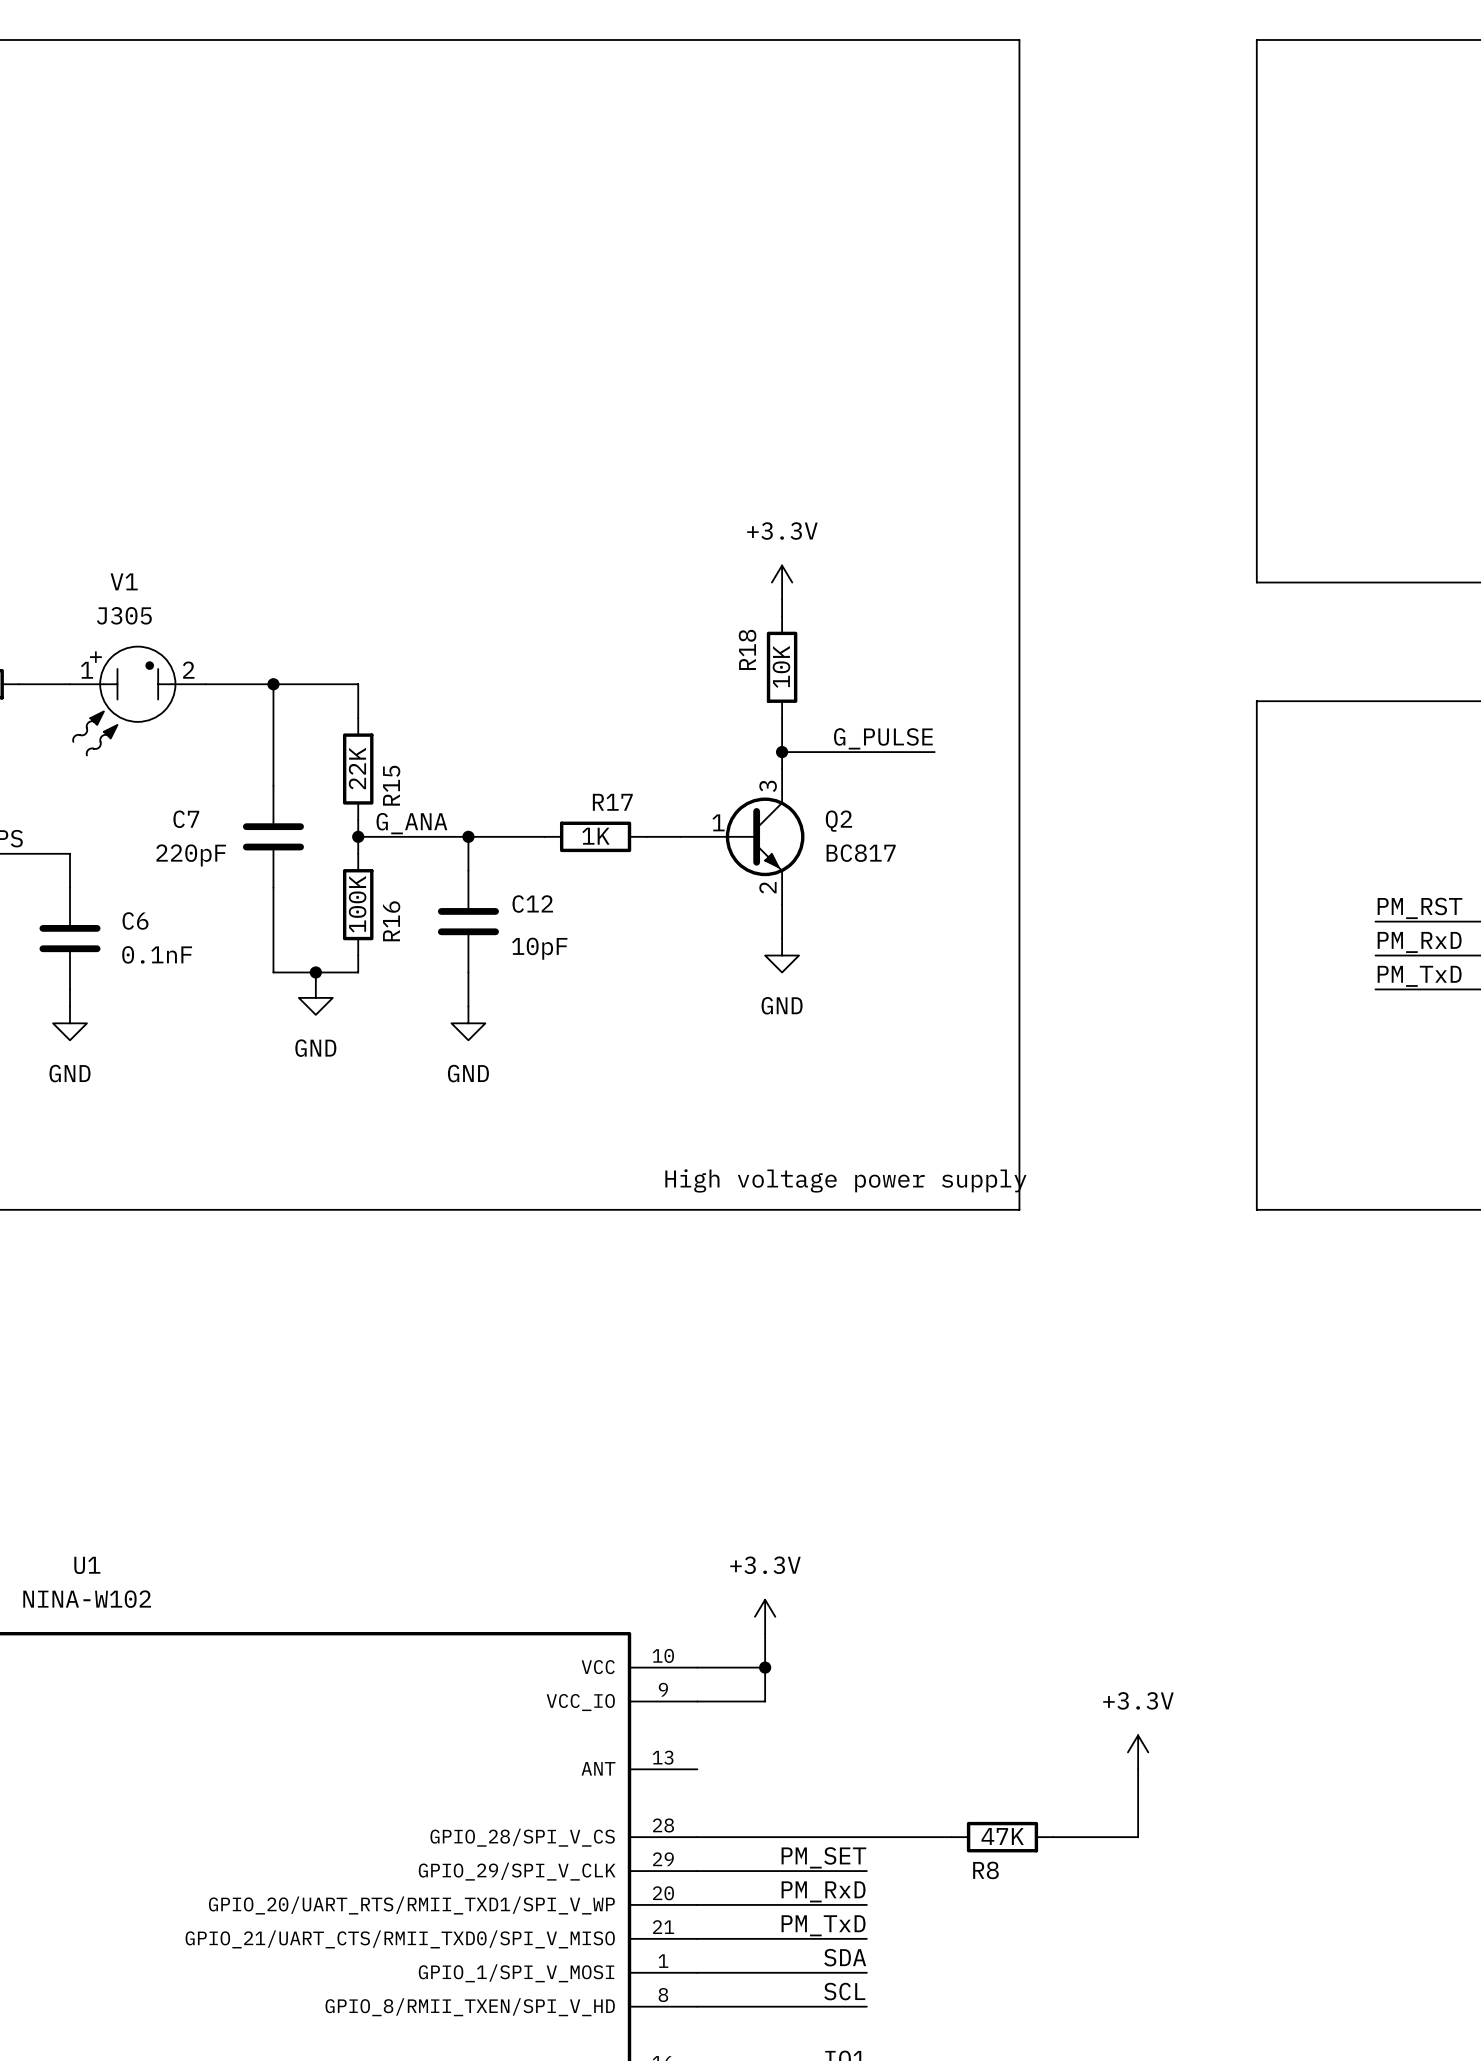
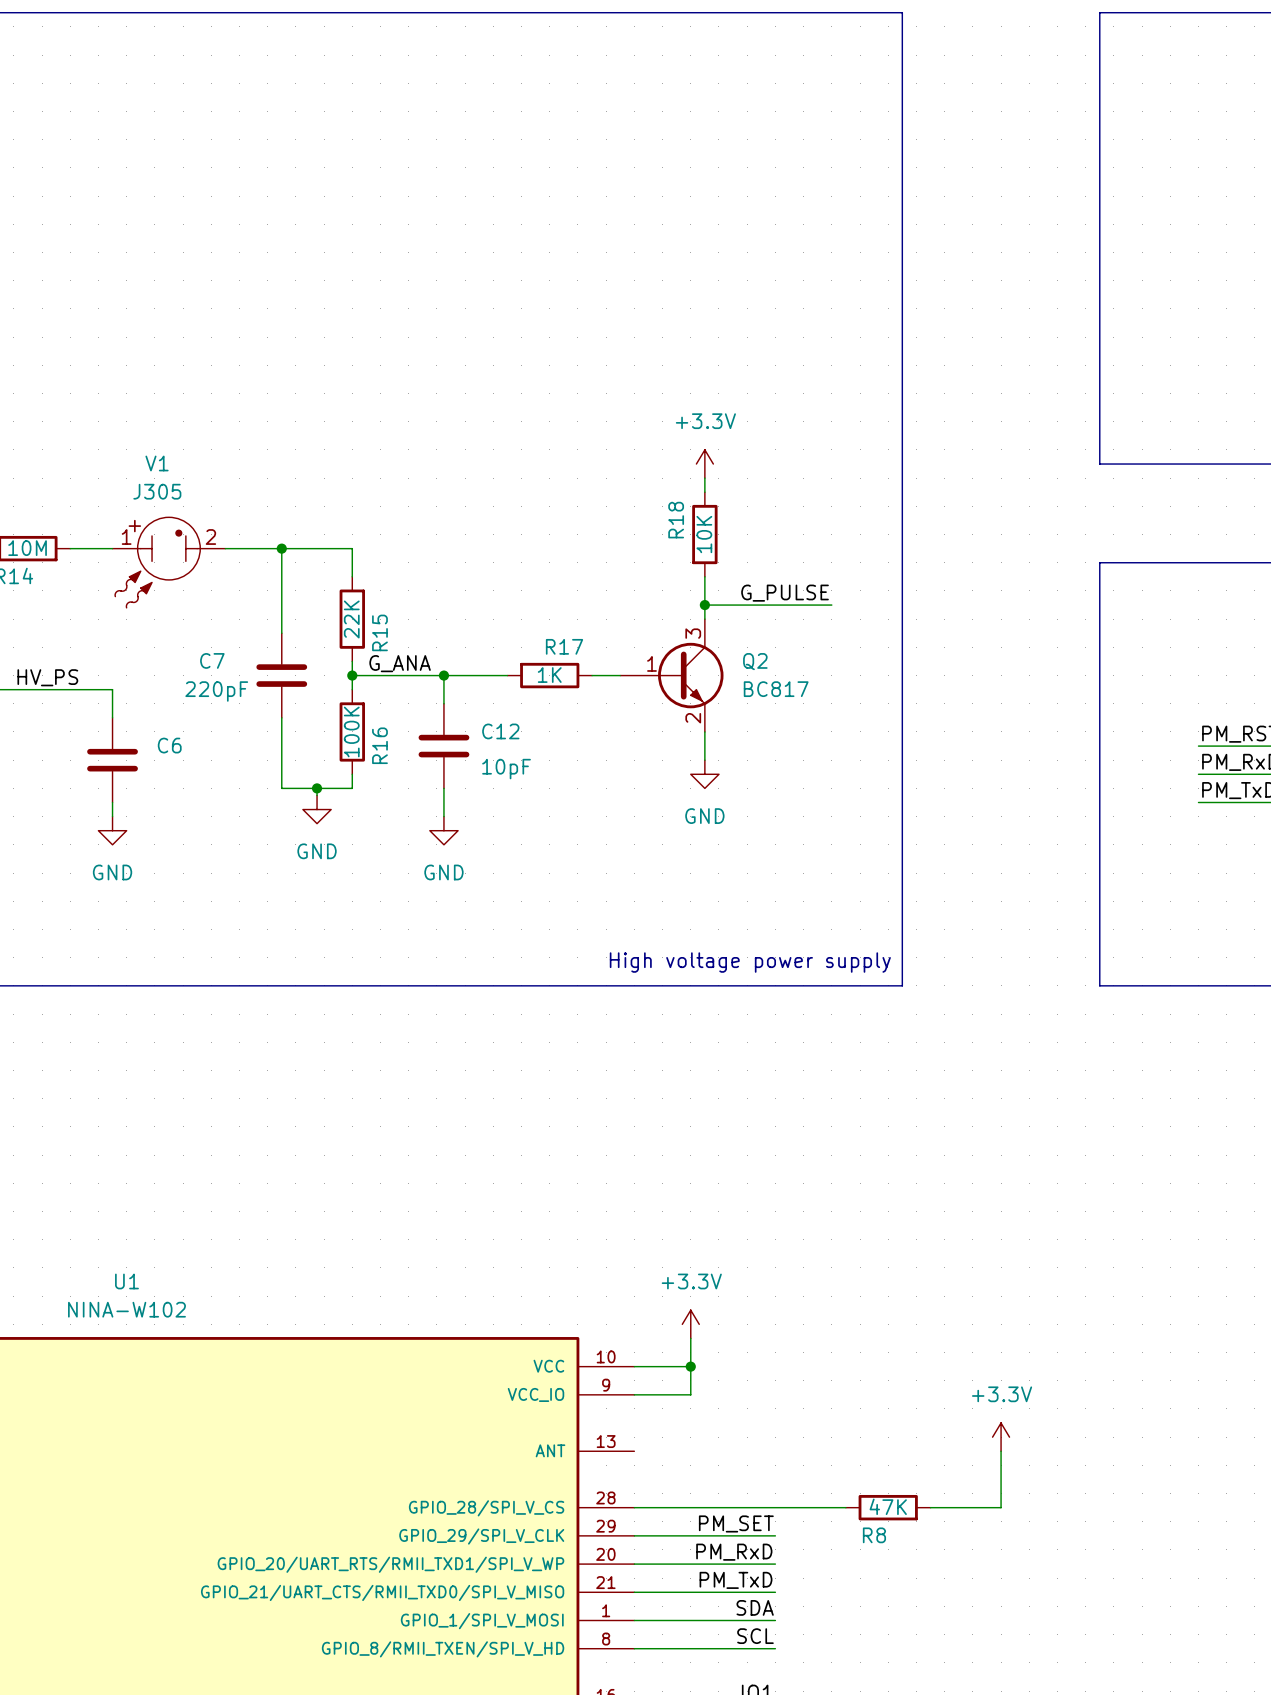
C6 value: 0.1nF (157, 954) -> none

